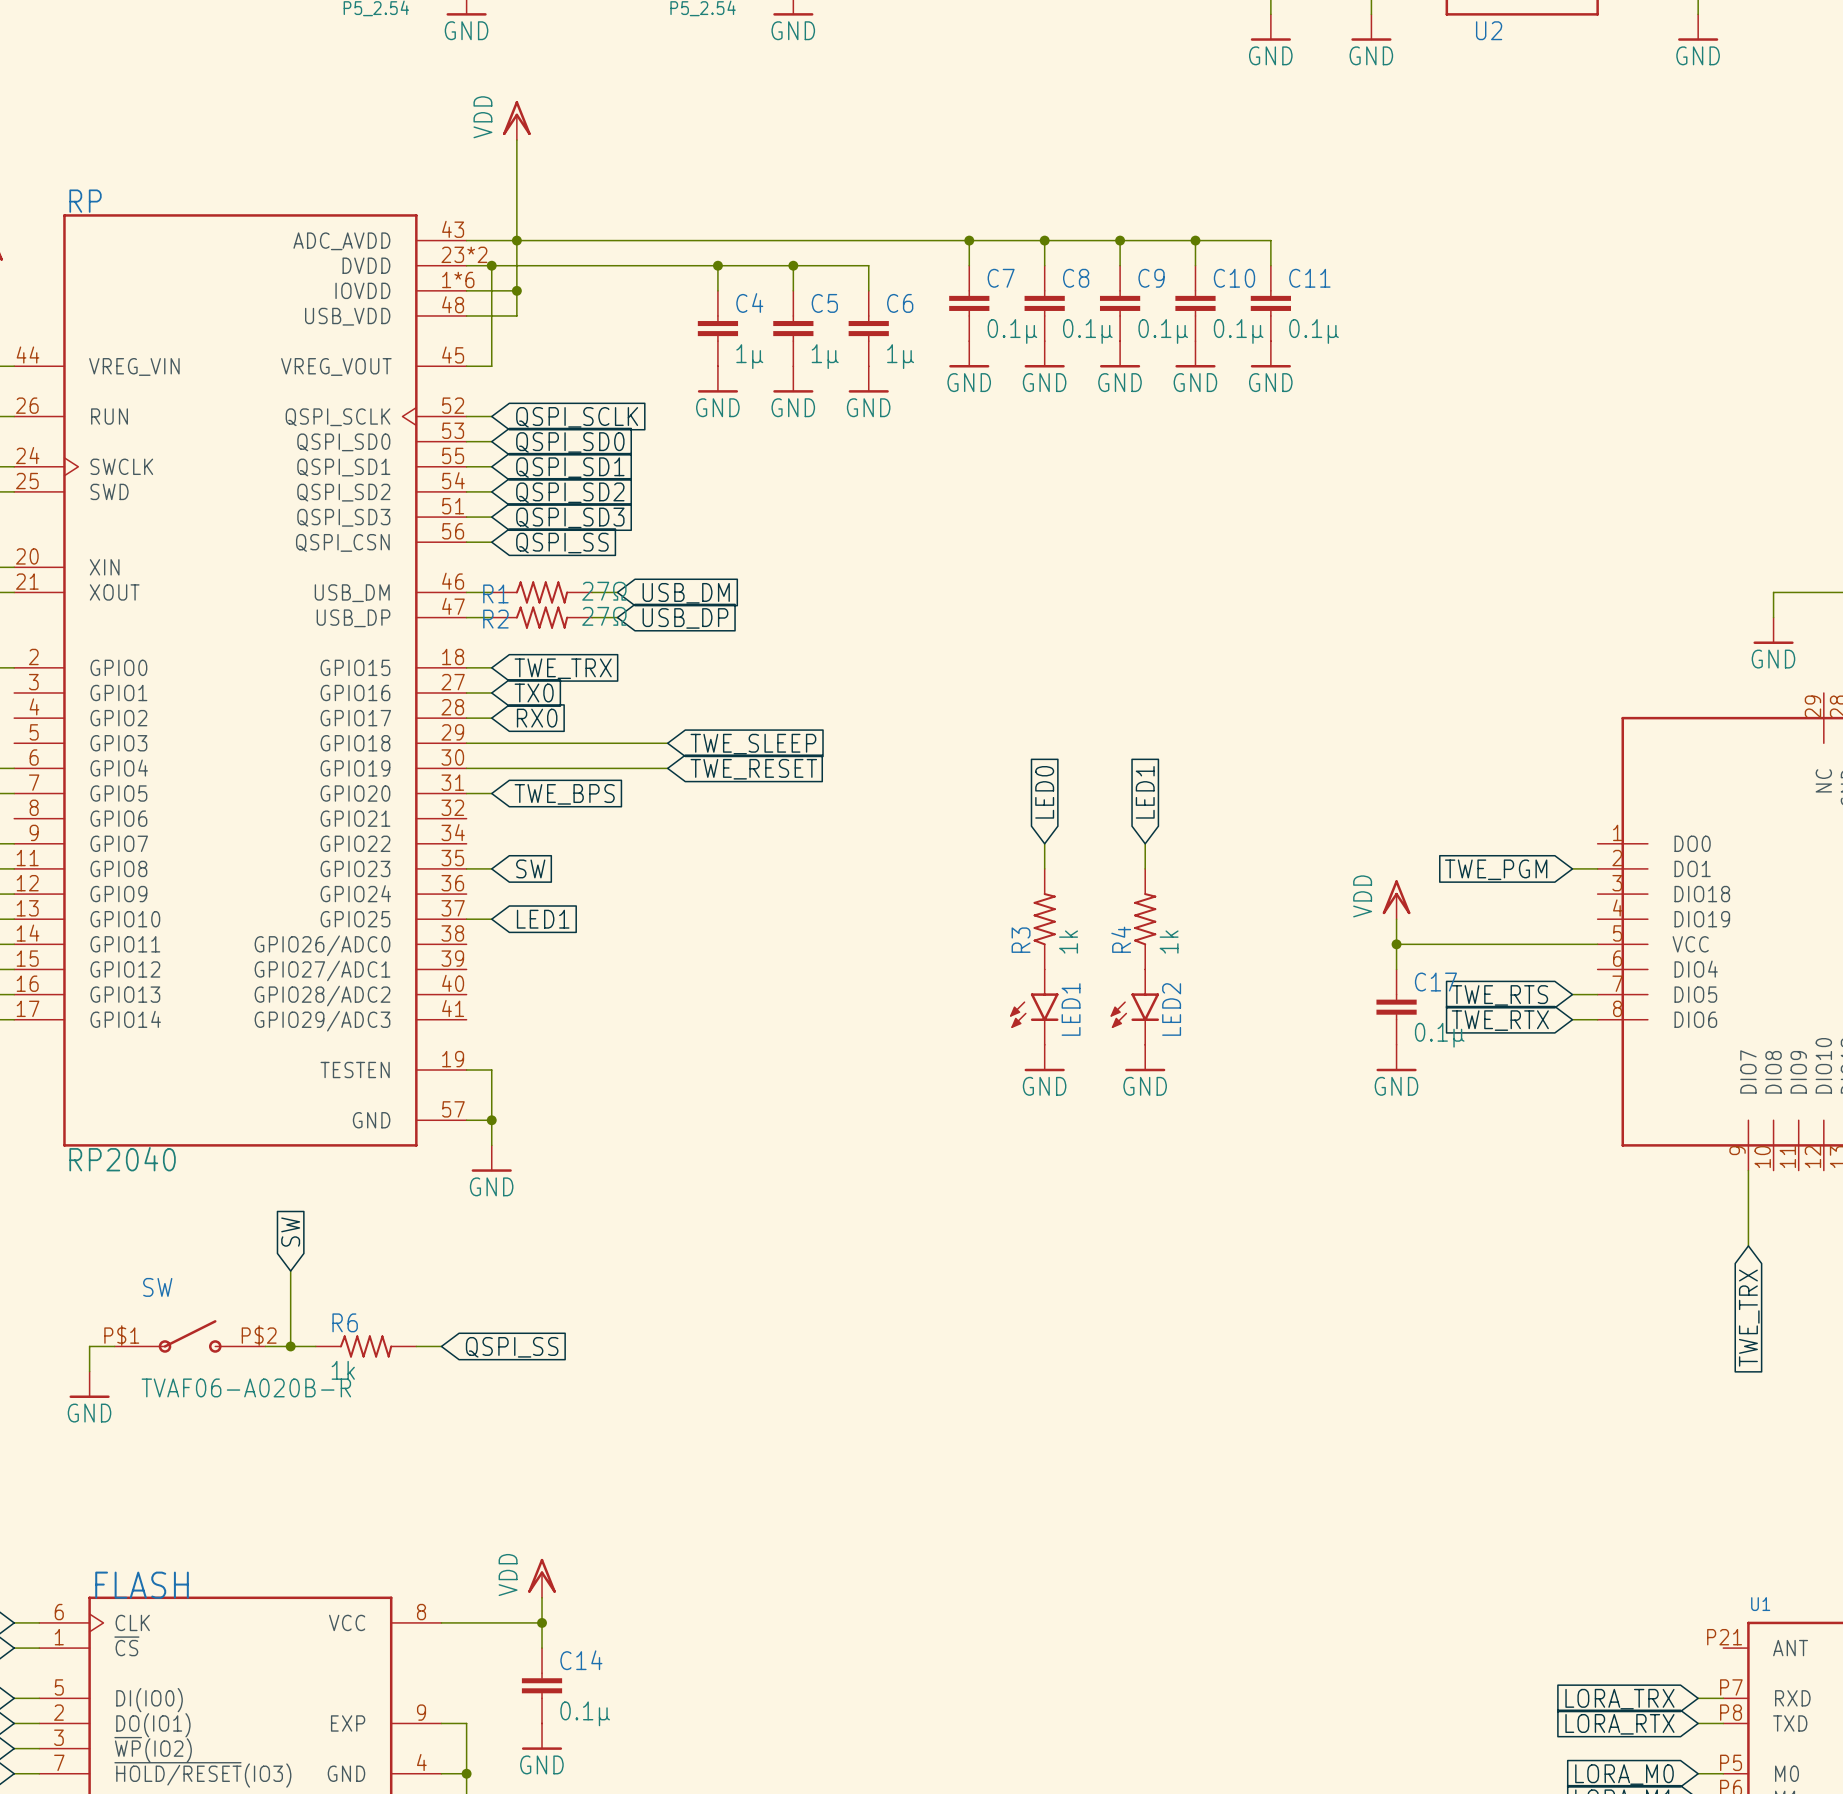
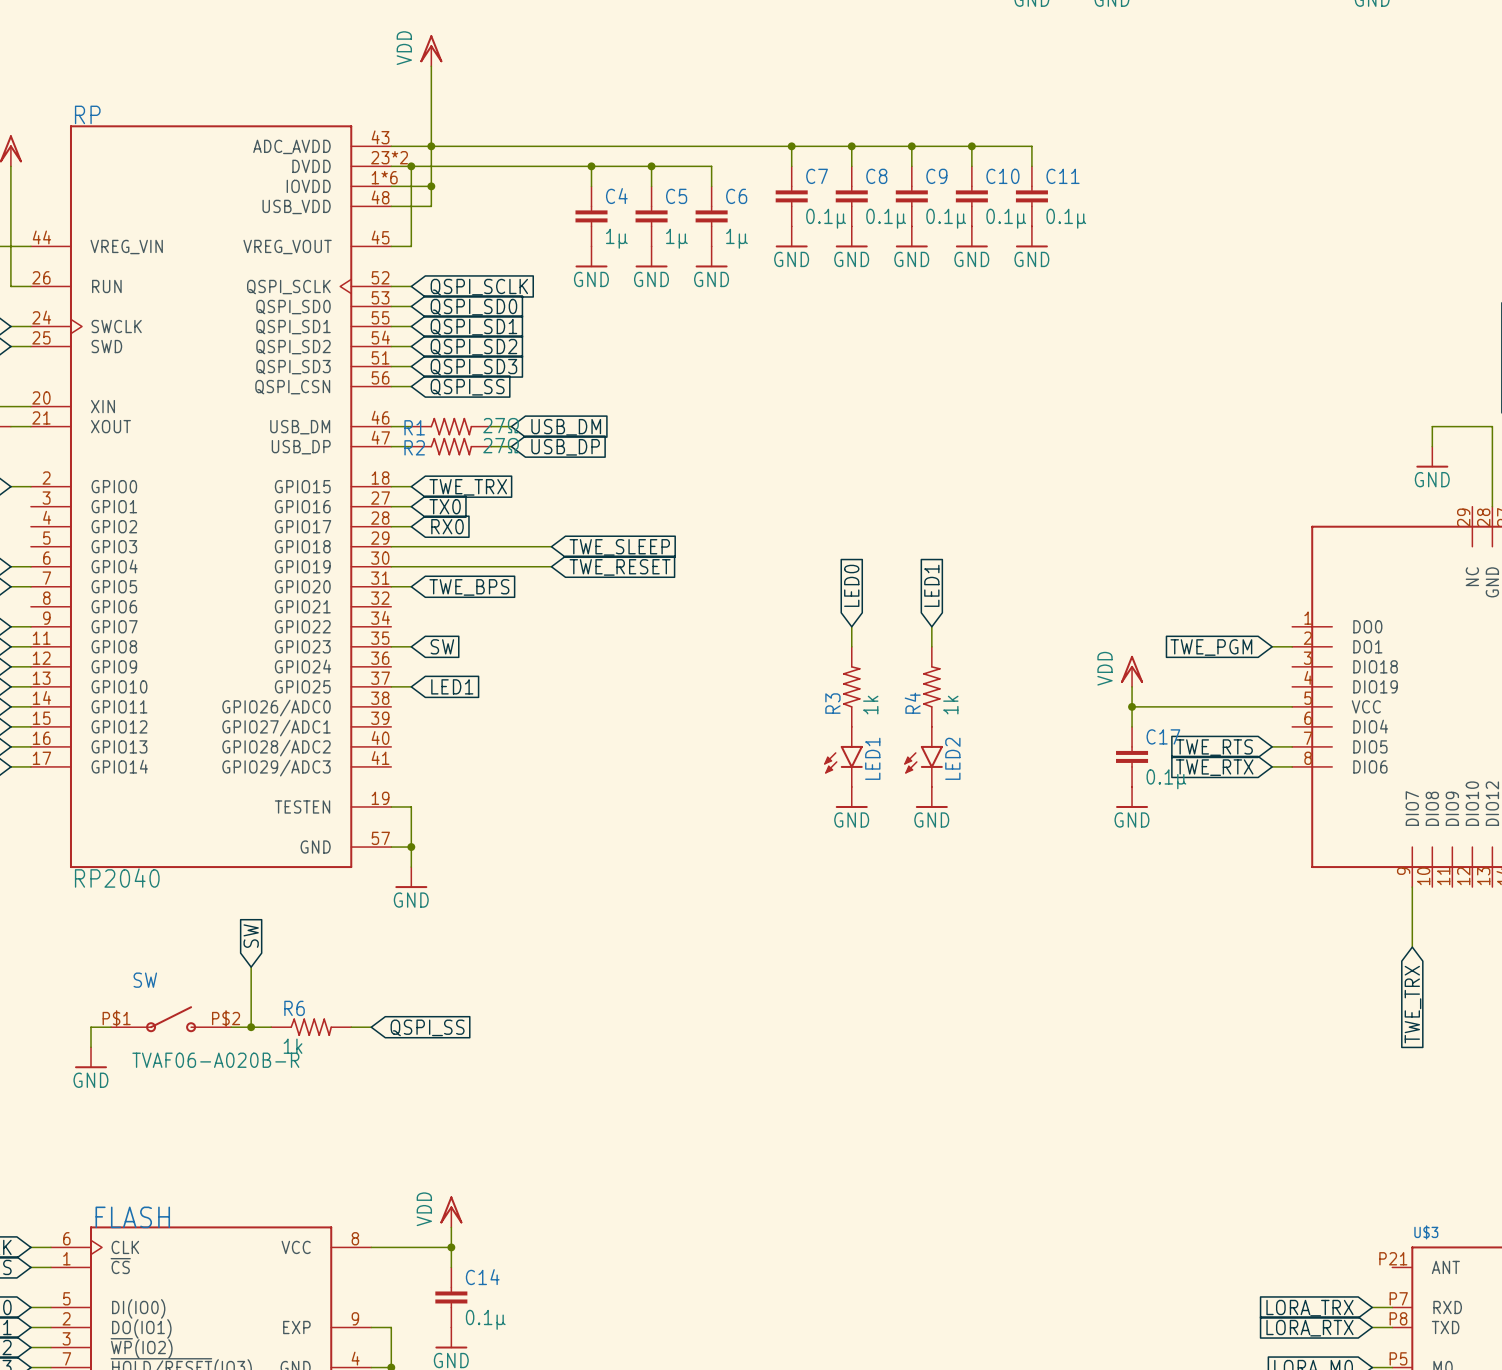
U1 name: U1 (1760, 1604) -> U$3 (1426, 1232)

